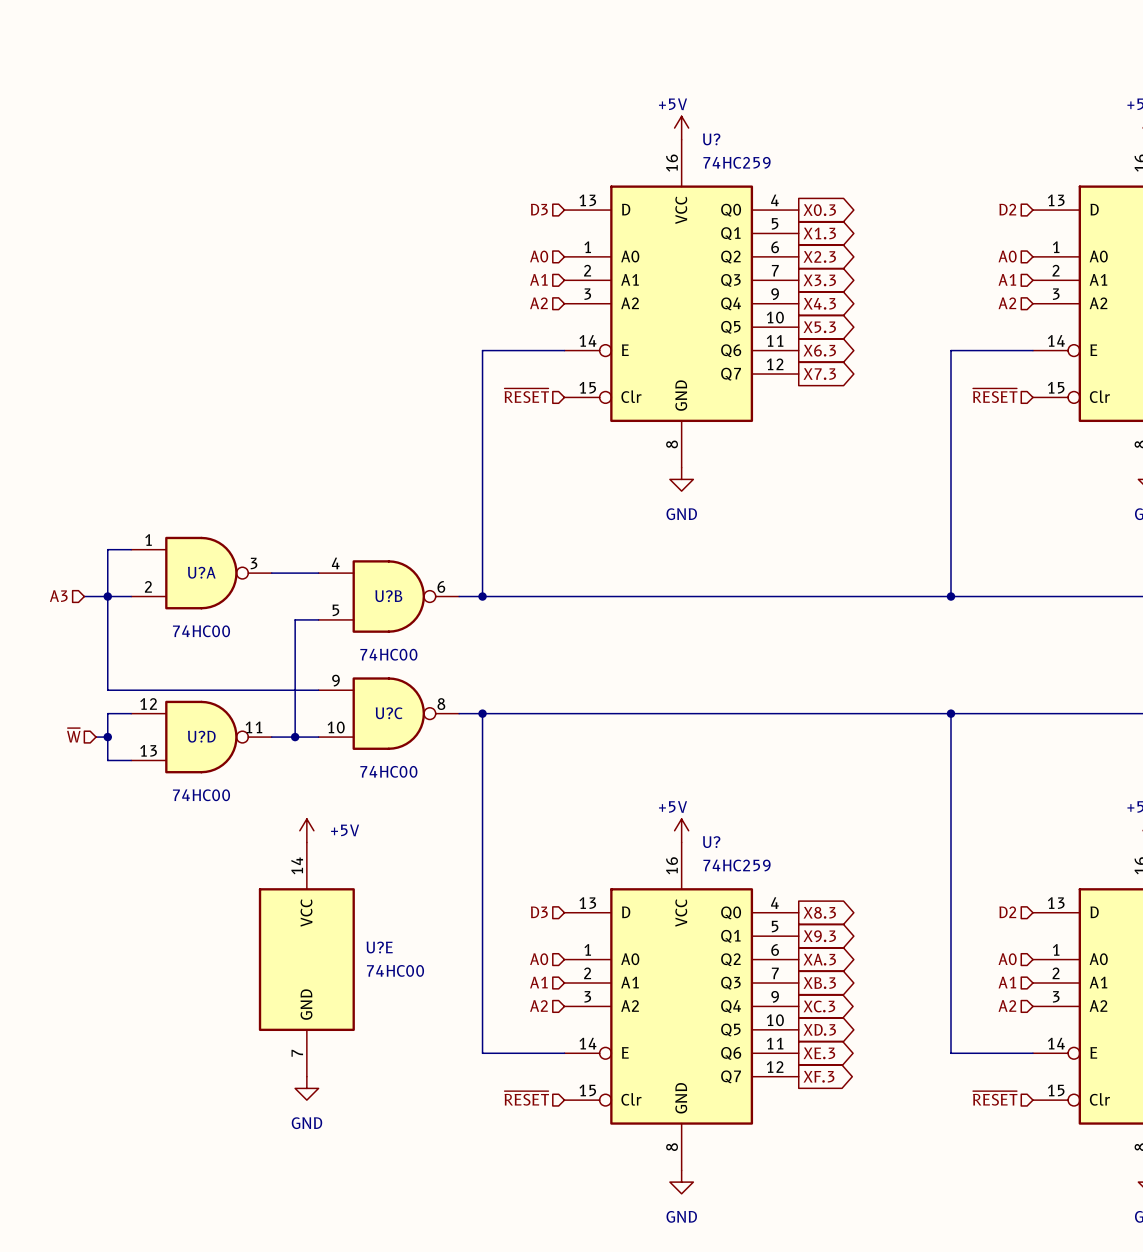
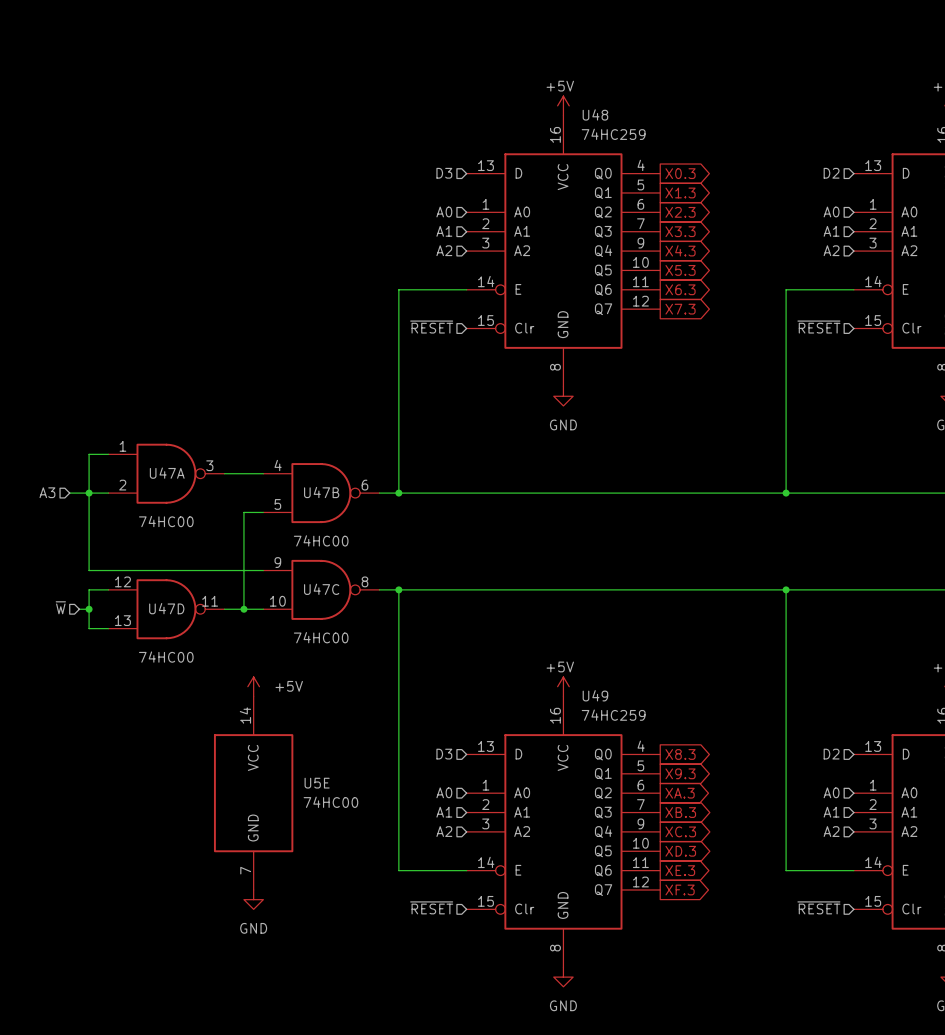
U? name: U? (711, 139) -> U48 (595, 114)
U?A name: U?A (201, 572) -> U47A (167, 473)
U?B name: U?B (388, 596) -> U47B (321, 492)
U?C name: U?C (389, 713) -> U47C (321, 589)
U?D name: U?D (201, 736) -> U47D (166, 608)
U? name: U? (711, 842) -> U49 (595, 695)
U?E name: U?E (379, 947) -> U5E (317, 783)

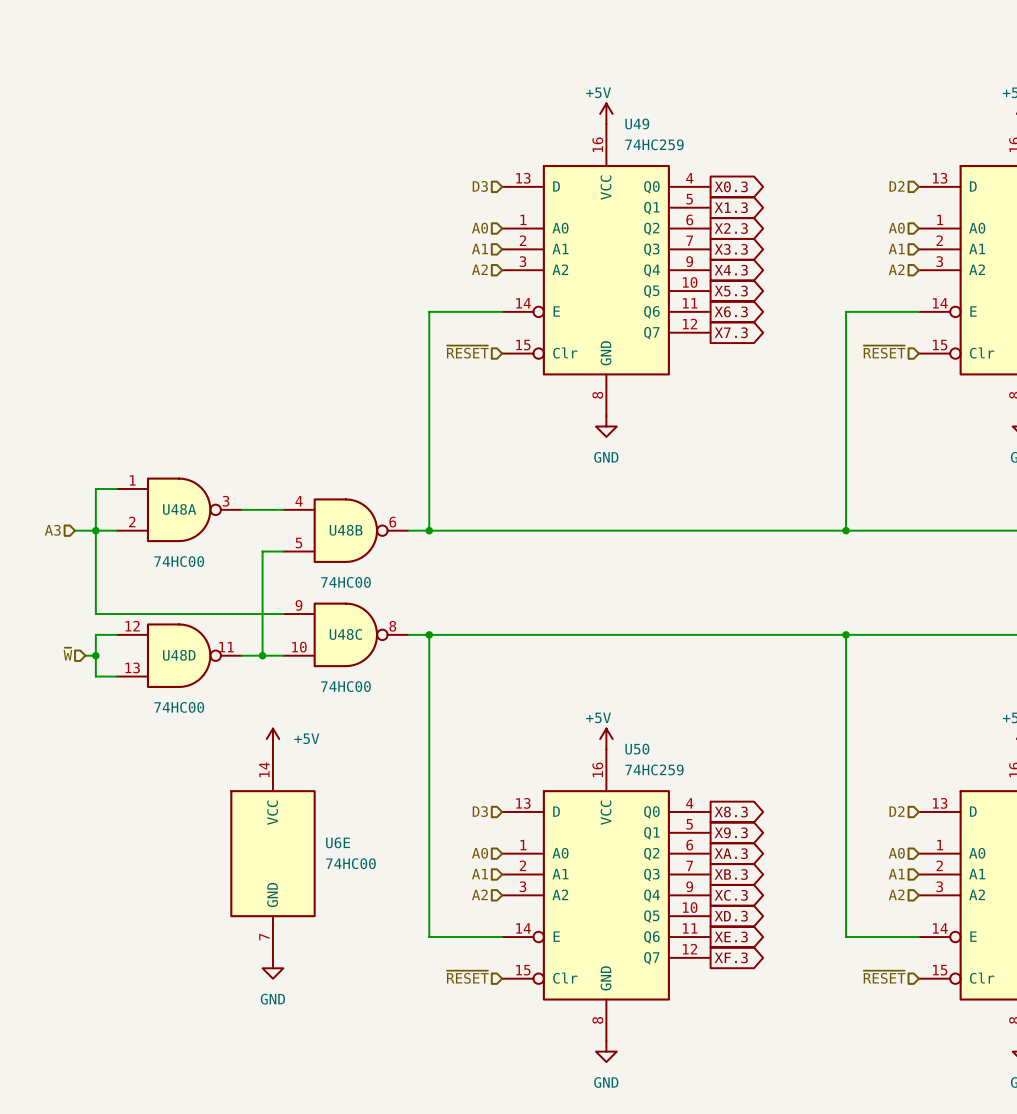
U48 name: U48 (595, 114) -> U49 (637, 123)
U47A name: U47A (167, 473) -> U48A (179, 509)
U47B name: U47B (321, 492) -> U48B (346, 530)
U47C name: U47C (321, 589) -> U48C (345, 634)
U47D name: U47D (166, 608) -> U48D (179, 655)
U49 name: U49 (595, 695) -> U50 (637, 749)
U5E name: U5E (317, 783) -> U6E (338, 842)

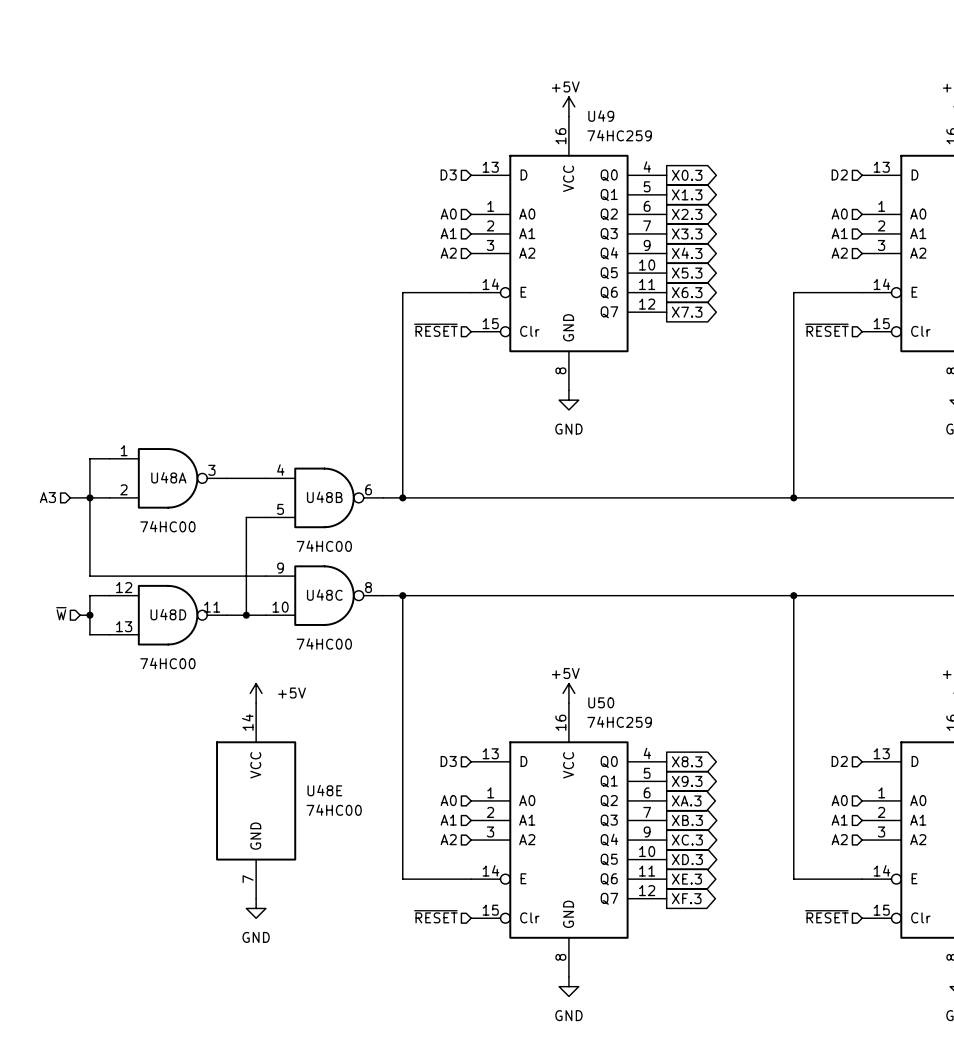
U6E name: U6E (338, 842) -> U48E (324, 790)

